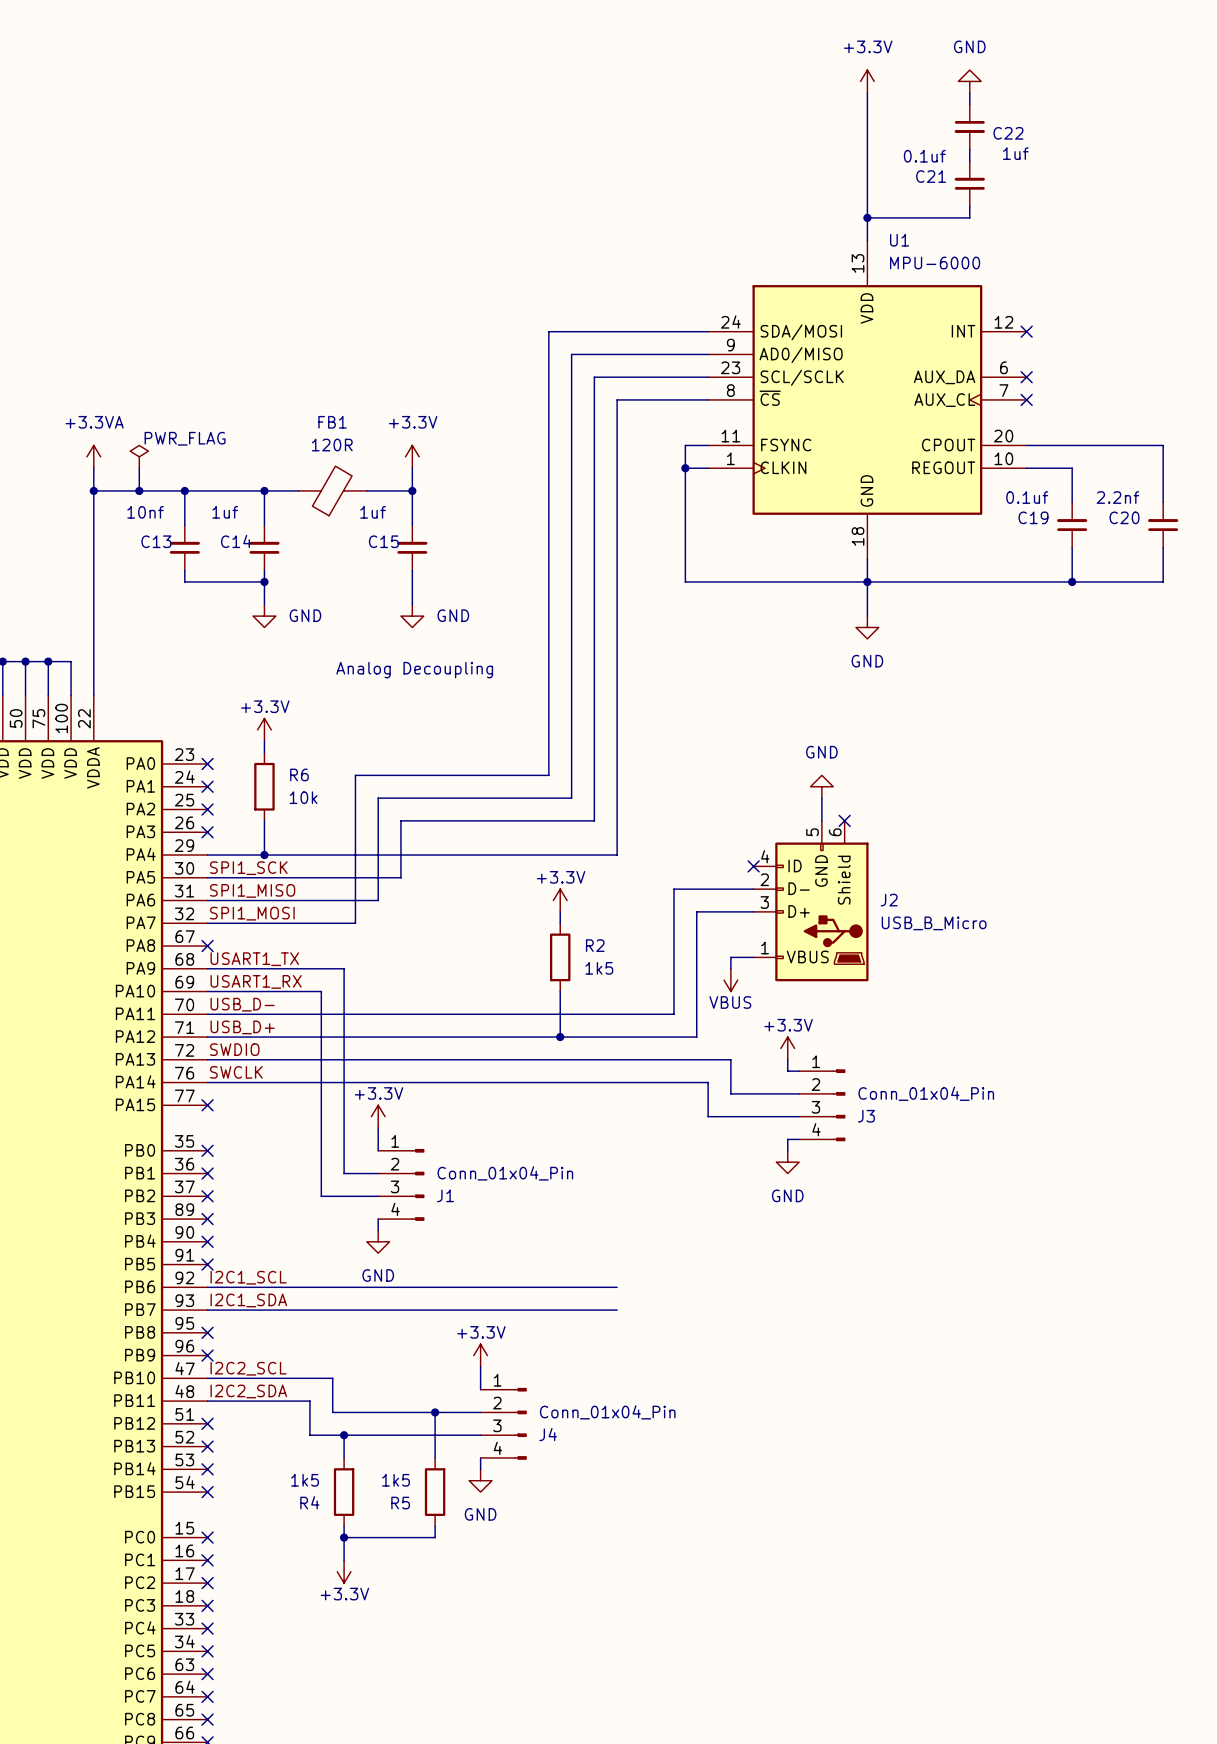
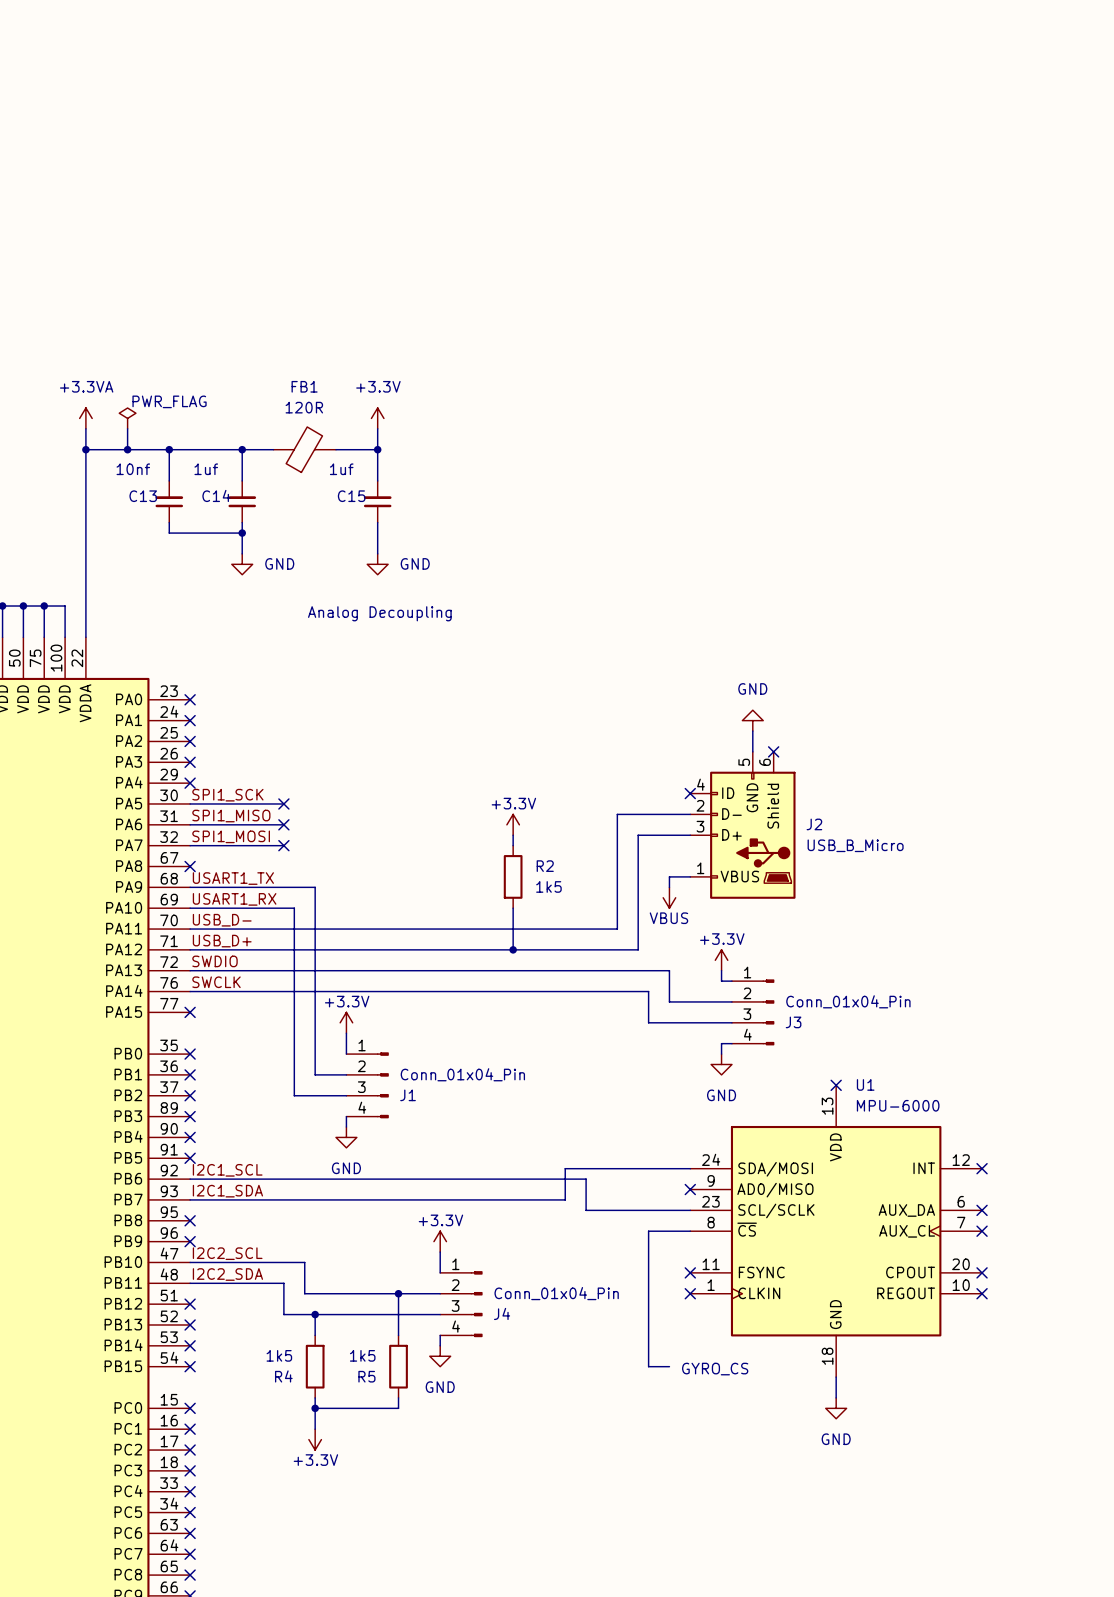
power symbol: +3.3V (867, 81) -> none
power symbol: GND (969, 81) -> none
wire: (867, 92) (867, 240) -> none
wire: (969, 92) (969, 104) -> none
C22: 1uf (969, 126) -> none
wire: (969, 149) (969, 161) -> none
C21: 0.1uf (969, 183) -> none
wire: (969, 206) (969, 217) (867, 217) -> none
junction: (867, 217) -> none
wire: (708, 331) (548, 331) (548, 775) (355, 775) (355, 923) (309, 923) -> none
no-connect mark: (1026, 331) -> none
wire: (708, 354) (571, 354) (571, 798) (378, 798) (378, 900) (309, 900) -> none
wire: (708, 377) (594, 377) (594, 820) (400, 820) (400, 877) (309, 877) -> none
no-connect mark: (1026, 377) -> none
wire: (708, 399) (617, 399) (617, 855) (207, 855) -> none
U1 position: (867, 399) -> (836, 1231)
no-connect mark: (1026, 399) -> none
wire: (708, 445) (685, 445) (685, 581) (1163, 581) (1163, 547) -> none
wire: (1026, 445) (1163, 445) (1163, 502) -> none
wire: (685, 468) (708, 468) -> none
junction: (685, 468) -> none
wire: (1026, 468) (1072, 468) (1072, 502) -> none
C19: 0.1uf (1072, 525) -> none
C20: 2.2nf (1163, 525) -> none
wire: (1072, 547) (1072, 581) -> none
wire: (867, 559) (867, 616) -> none
junction: (867, 581) -> none
junction: (1072, 581) -> none
power symbol: GND (867, 627) -> none
power symbol: +3.3V (264, 729) -> none
wire: (264, 741) (264, 752) -> none
R6: 10k (264, 786) -> none
wire: (264, 820) (264, 855) -> none
no-connect mark: none -> (190, 783)
junction: (264, 855) -> none
no-connect mark: none -> (283, 803)
no-connect mark: none -> (283, 824)
no-connect mark: none -> (283, 845)
no-connect mark: none -> (836, 1085)
wire: none -> (690, 1168) (565, 1168) (565, 1199)
no-connect mark: none -> (982, 1168)
wire: none -> (565, 1179) (586, 1179) (586, 1210) (690, 1210)
no-connect mark: none -> (690, 1189)
no-connect mark: none -> (982, 1210)
wire: none -> (690, 1231) (648, 1231) (648, 1366) (669, 1366)
no-connect mark: none -> (982, 1231)
no-connect mark: none -> (690, 1272)
no-connect mark: none -> (982, 1272)
no-connect mark: none -> (690, 1293)
no-connect mark: none -> (982, 1293)
text: none -> GYRO_CS (715, 1369)
wire: none -> (836, 1377) (836, 1397)
power symbol: none -> GND (836, 1408)

